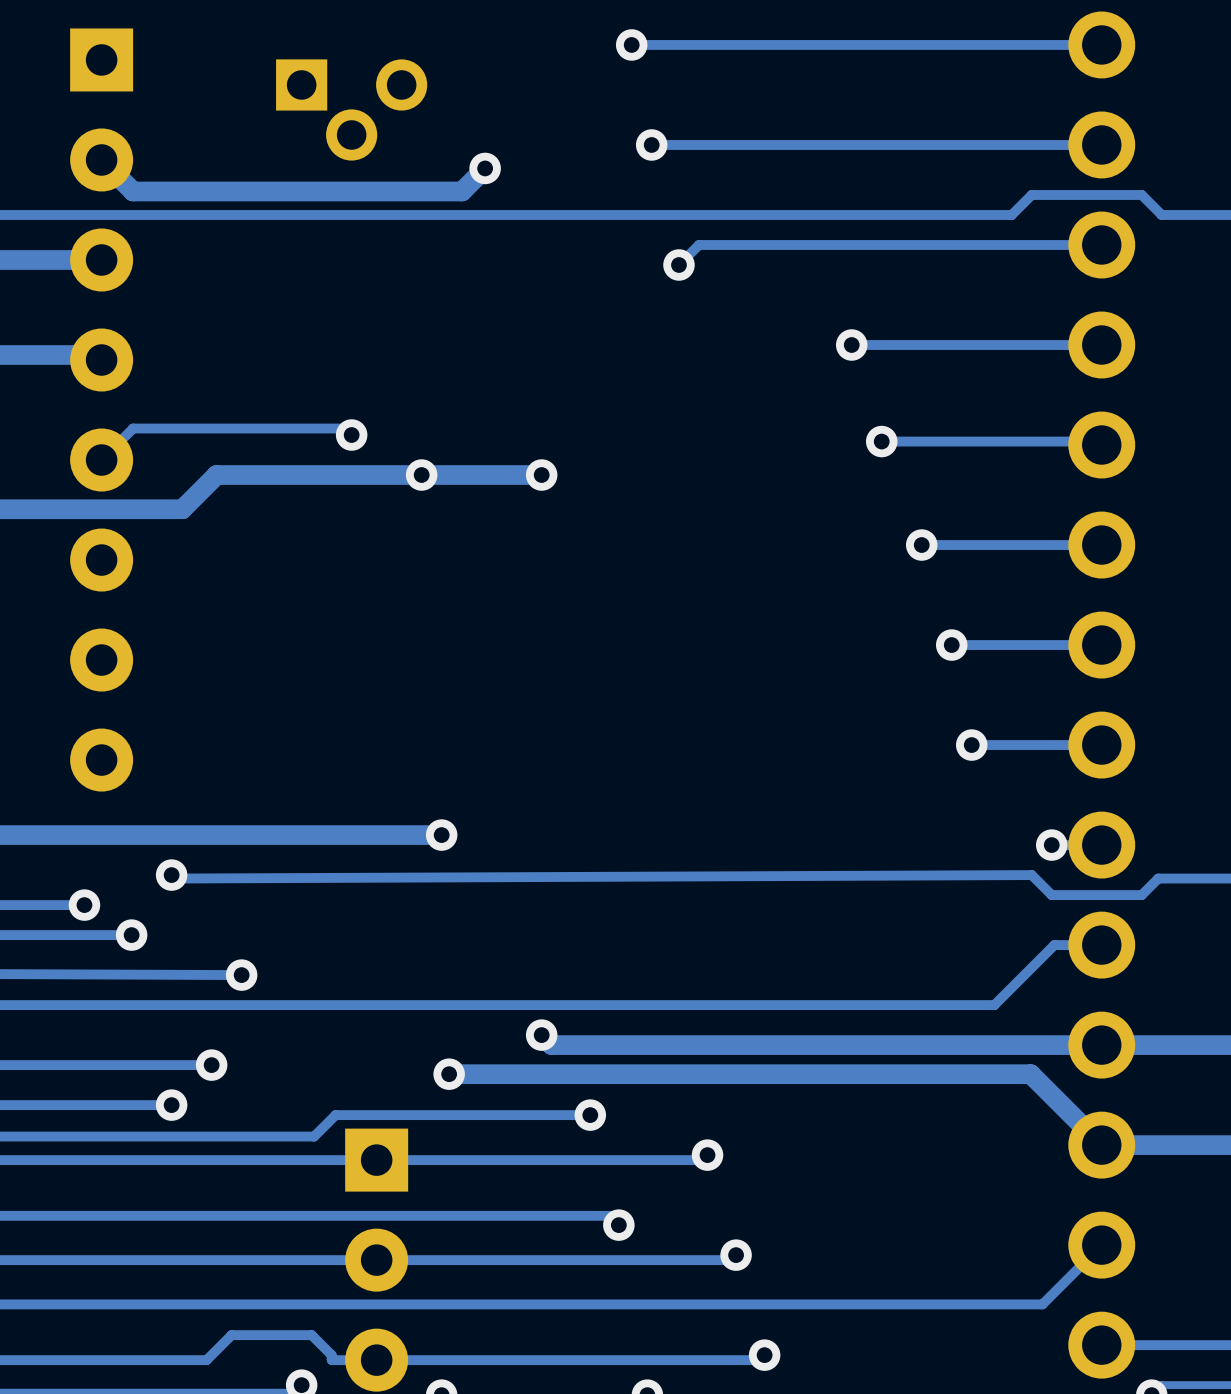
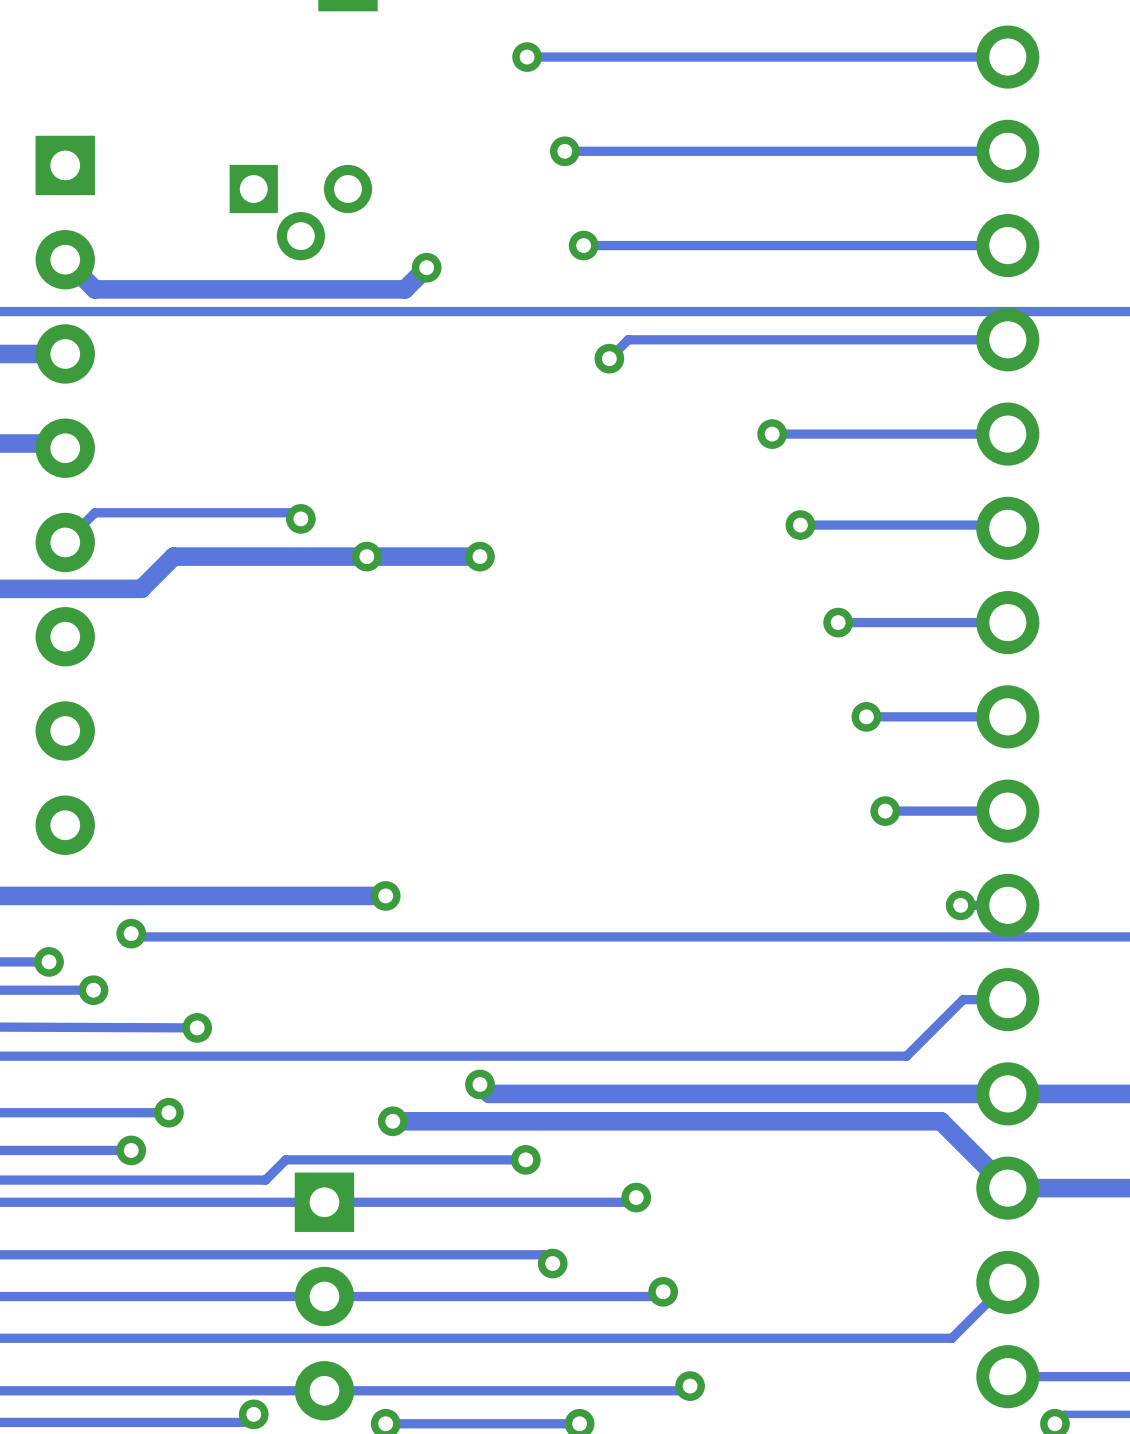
track: (1161, 214) (1141, 194) (1031, 194) (1011, 214) -> (1064, 311) (922, 311)
track: (1158, 878) (1141, 895) (1051, 895) (1031, 875) (175, 878) -> (1061, 936) (134, 936)
track: (331, 1359) (331, 1355) (311, 1335) (231, 1335) (206, 1360) -> (282, 1390) (164, 1390)

